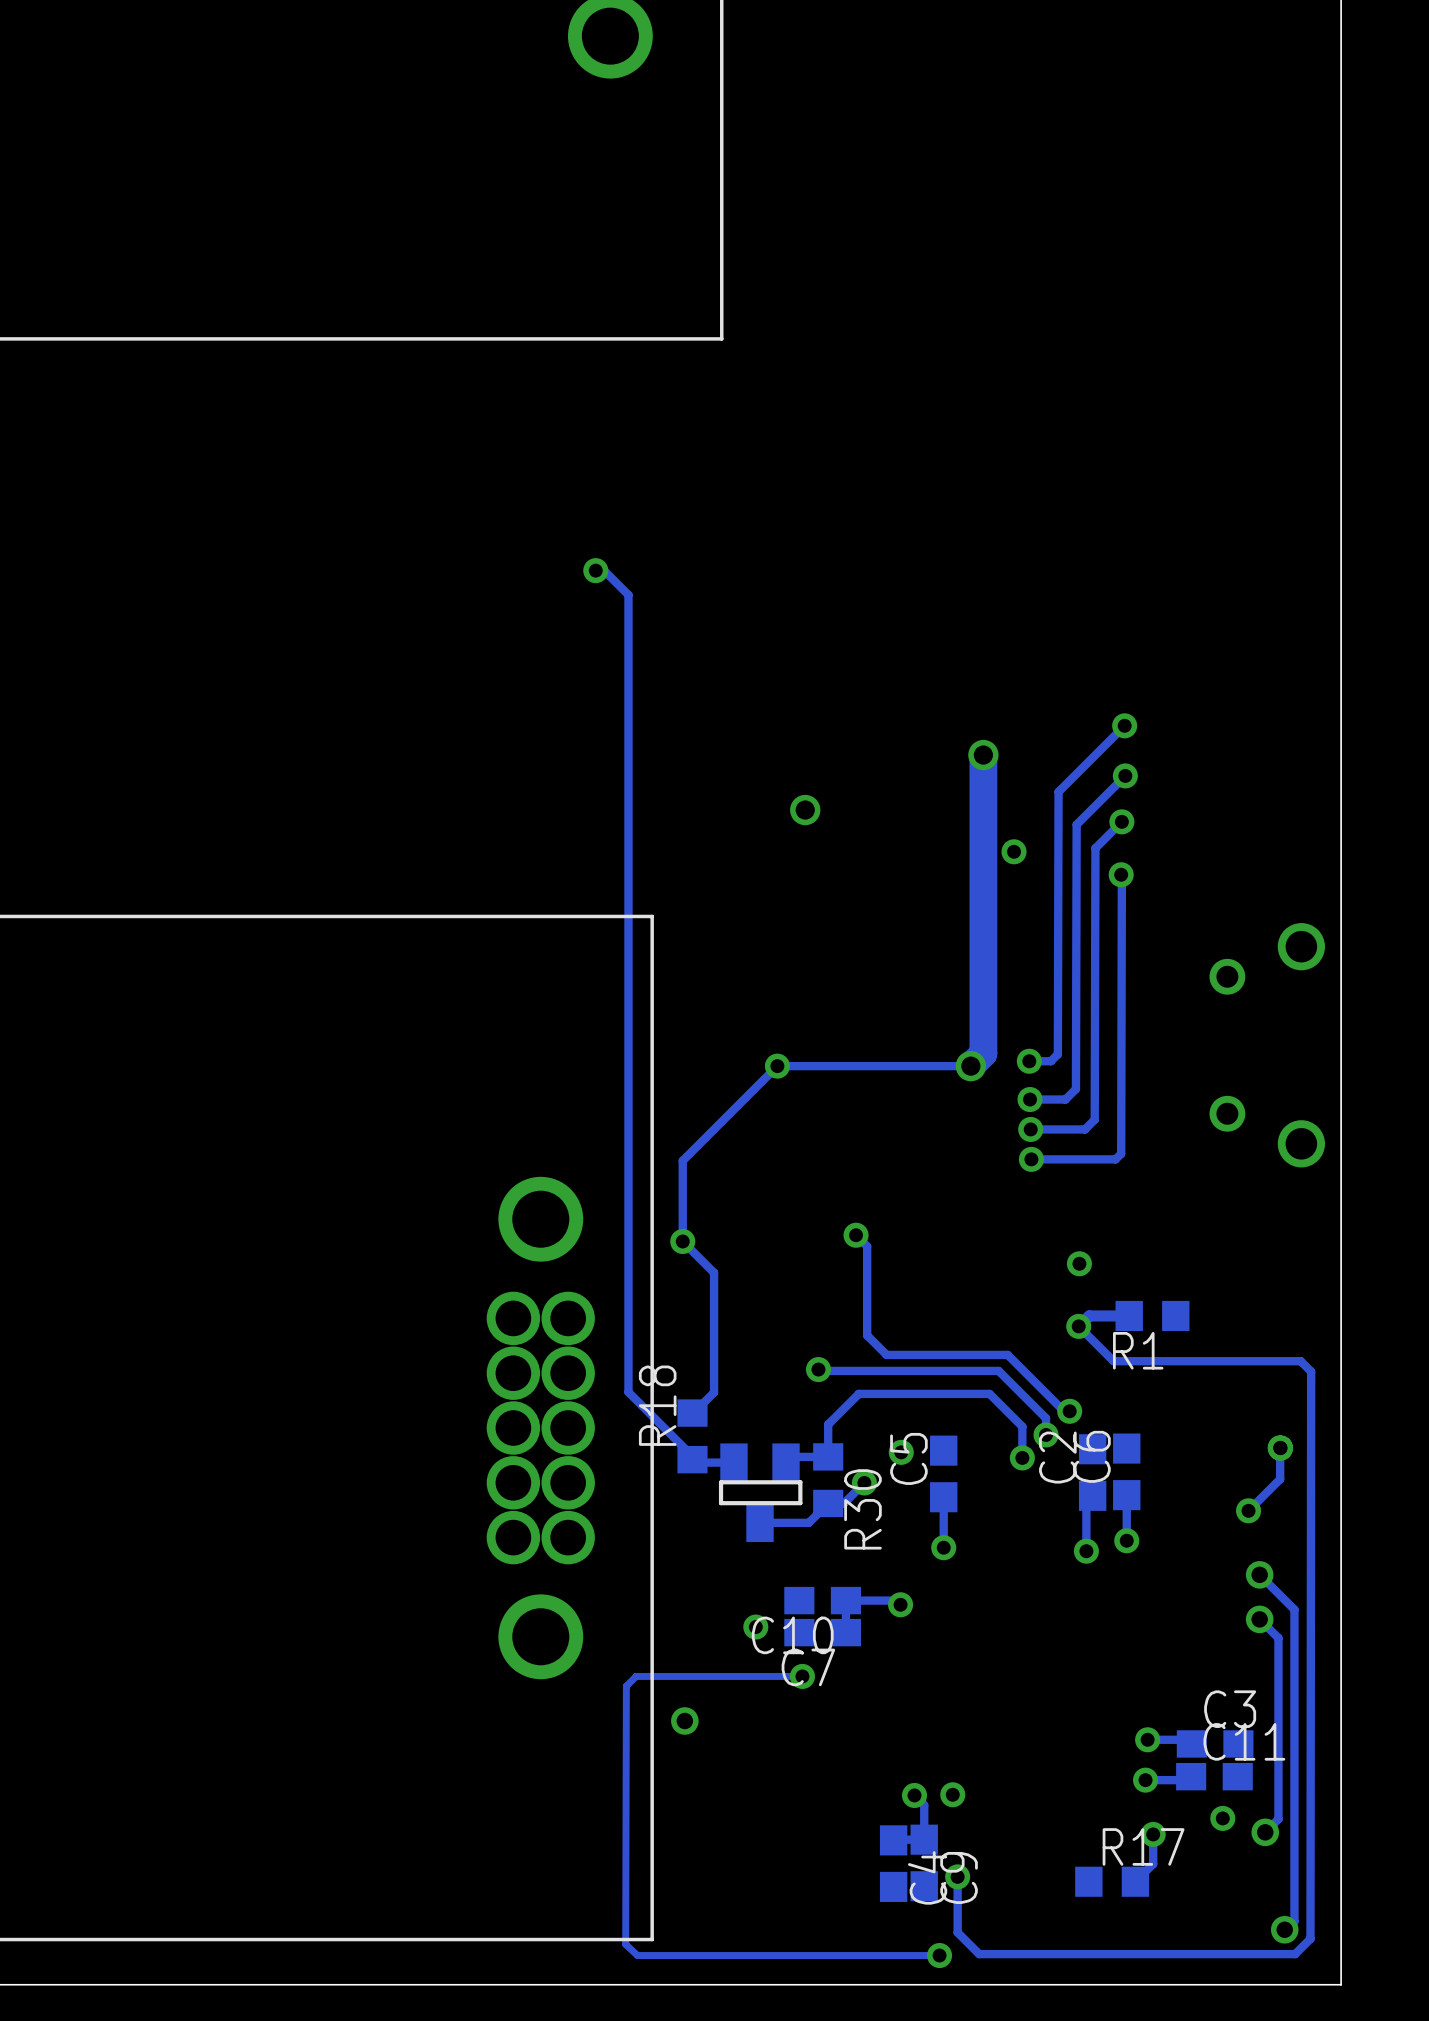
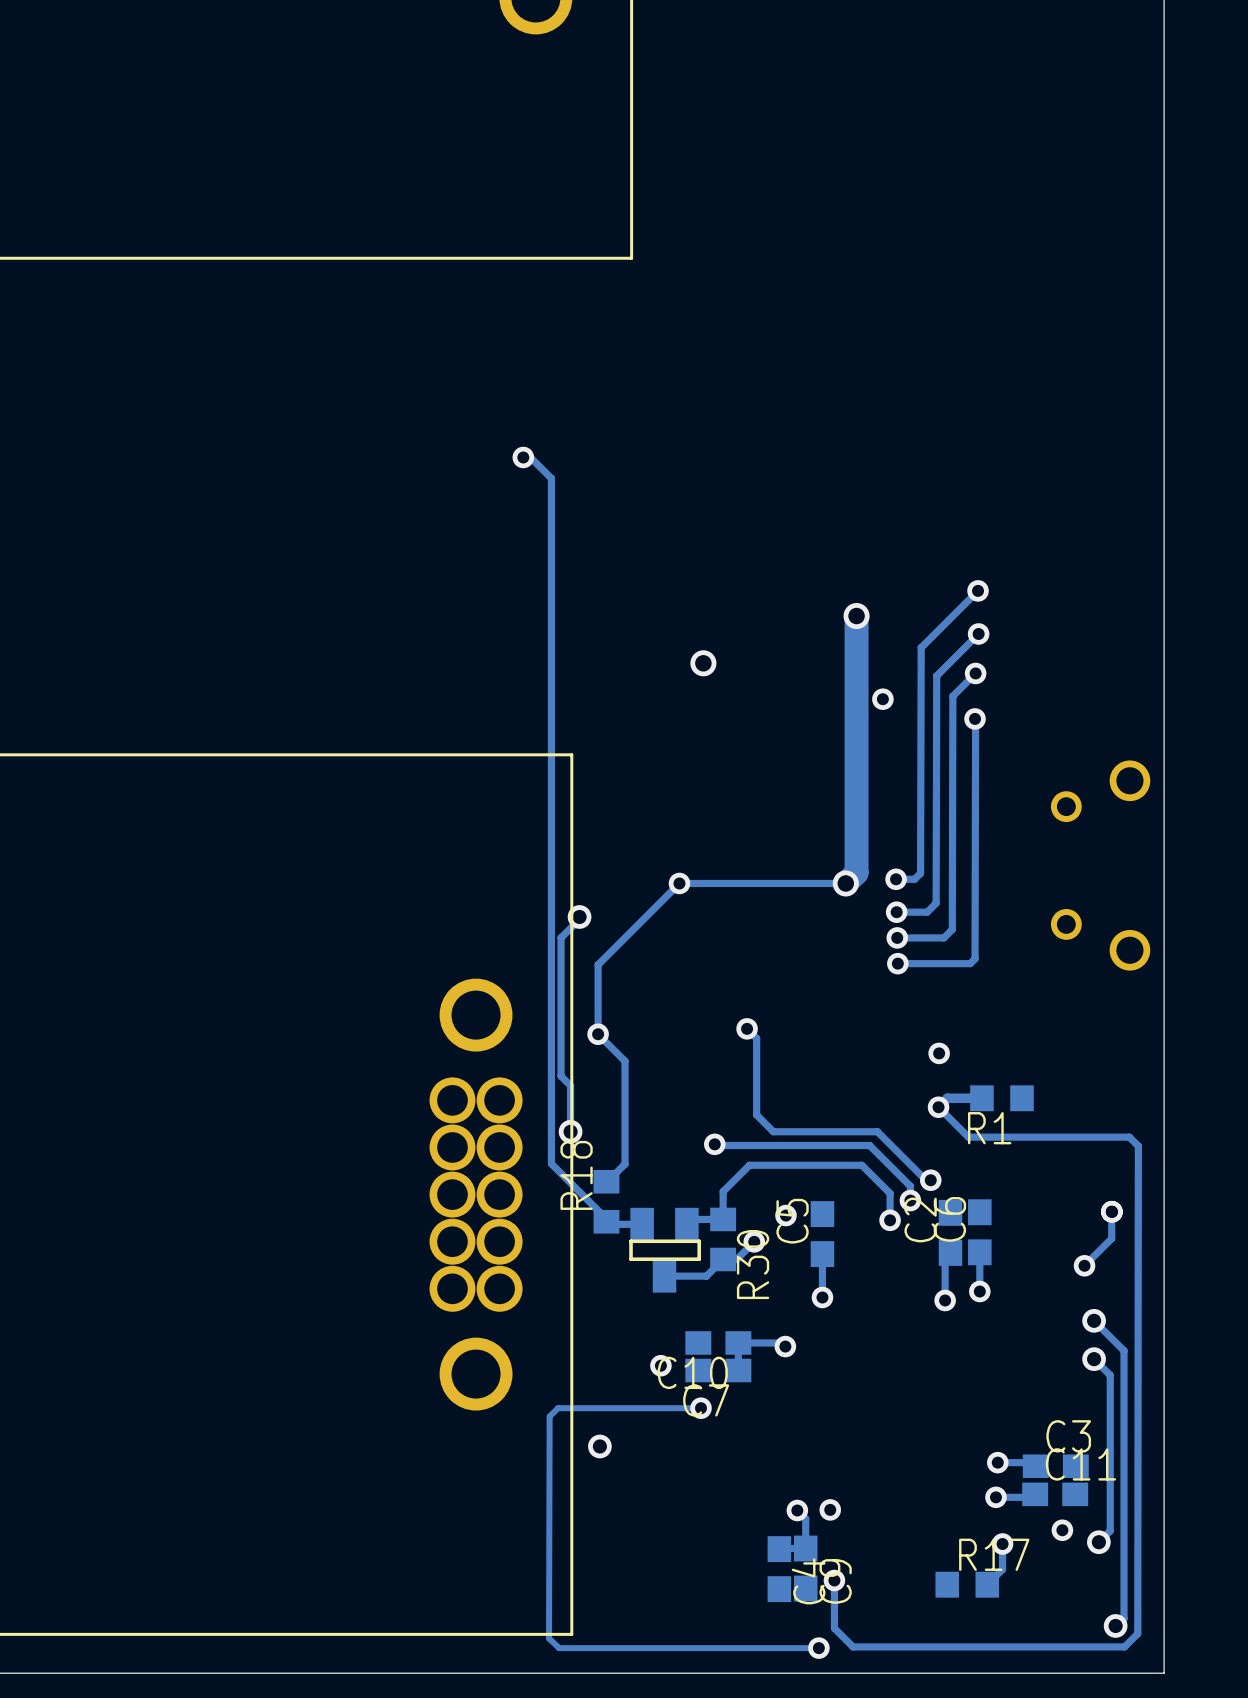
track: none -> (579, 916) (579, 919) (561, 937) (561, 1076) (570, 1085) (570, 1131)
via: none -> (579, 916)
via: none -> (570, 1131)

